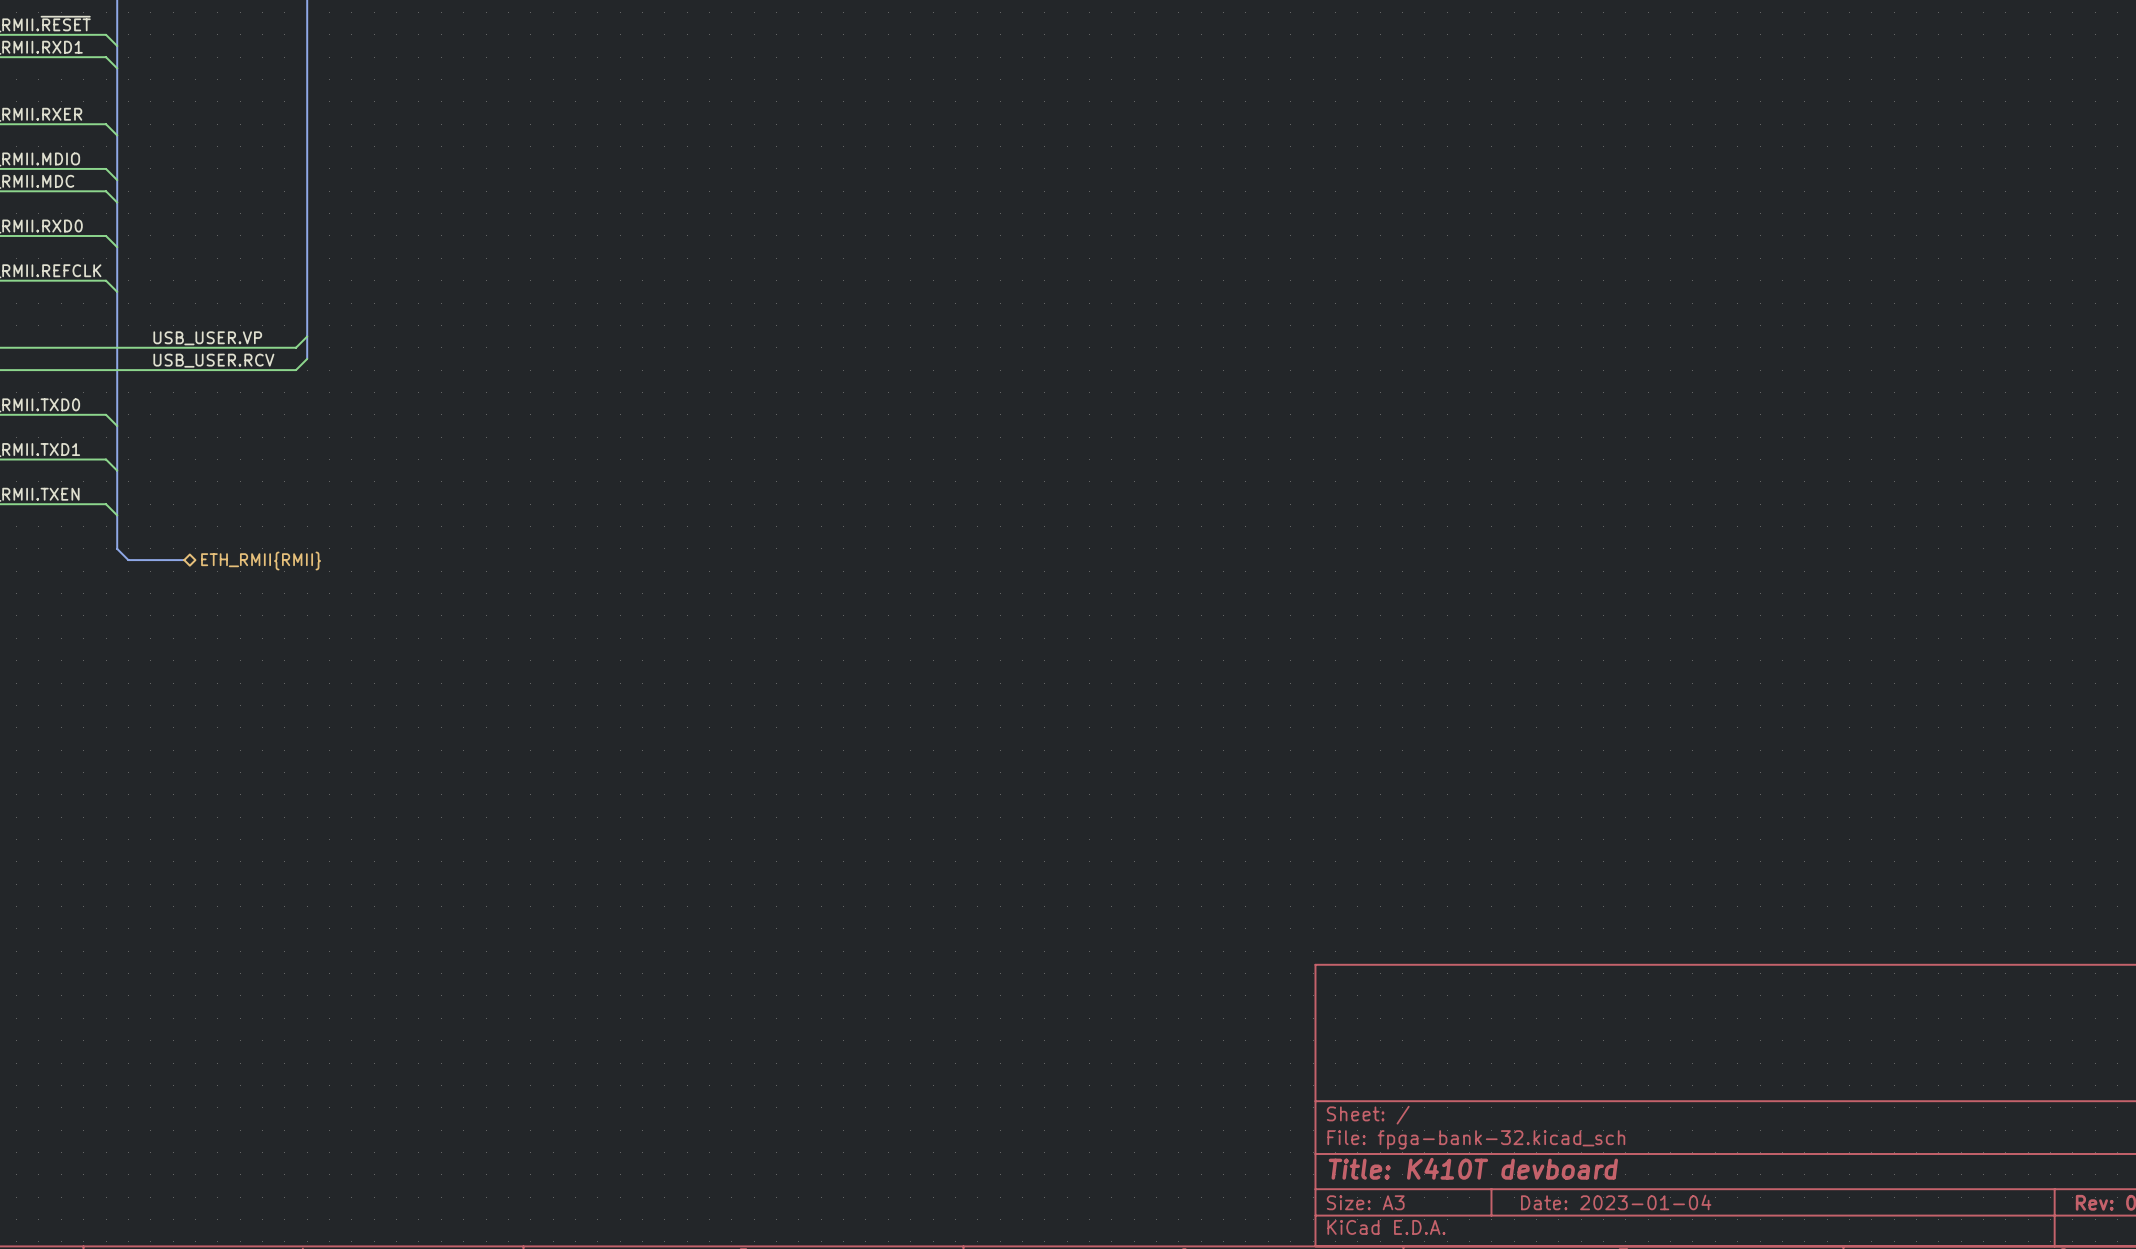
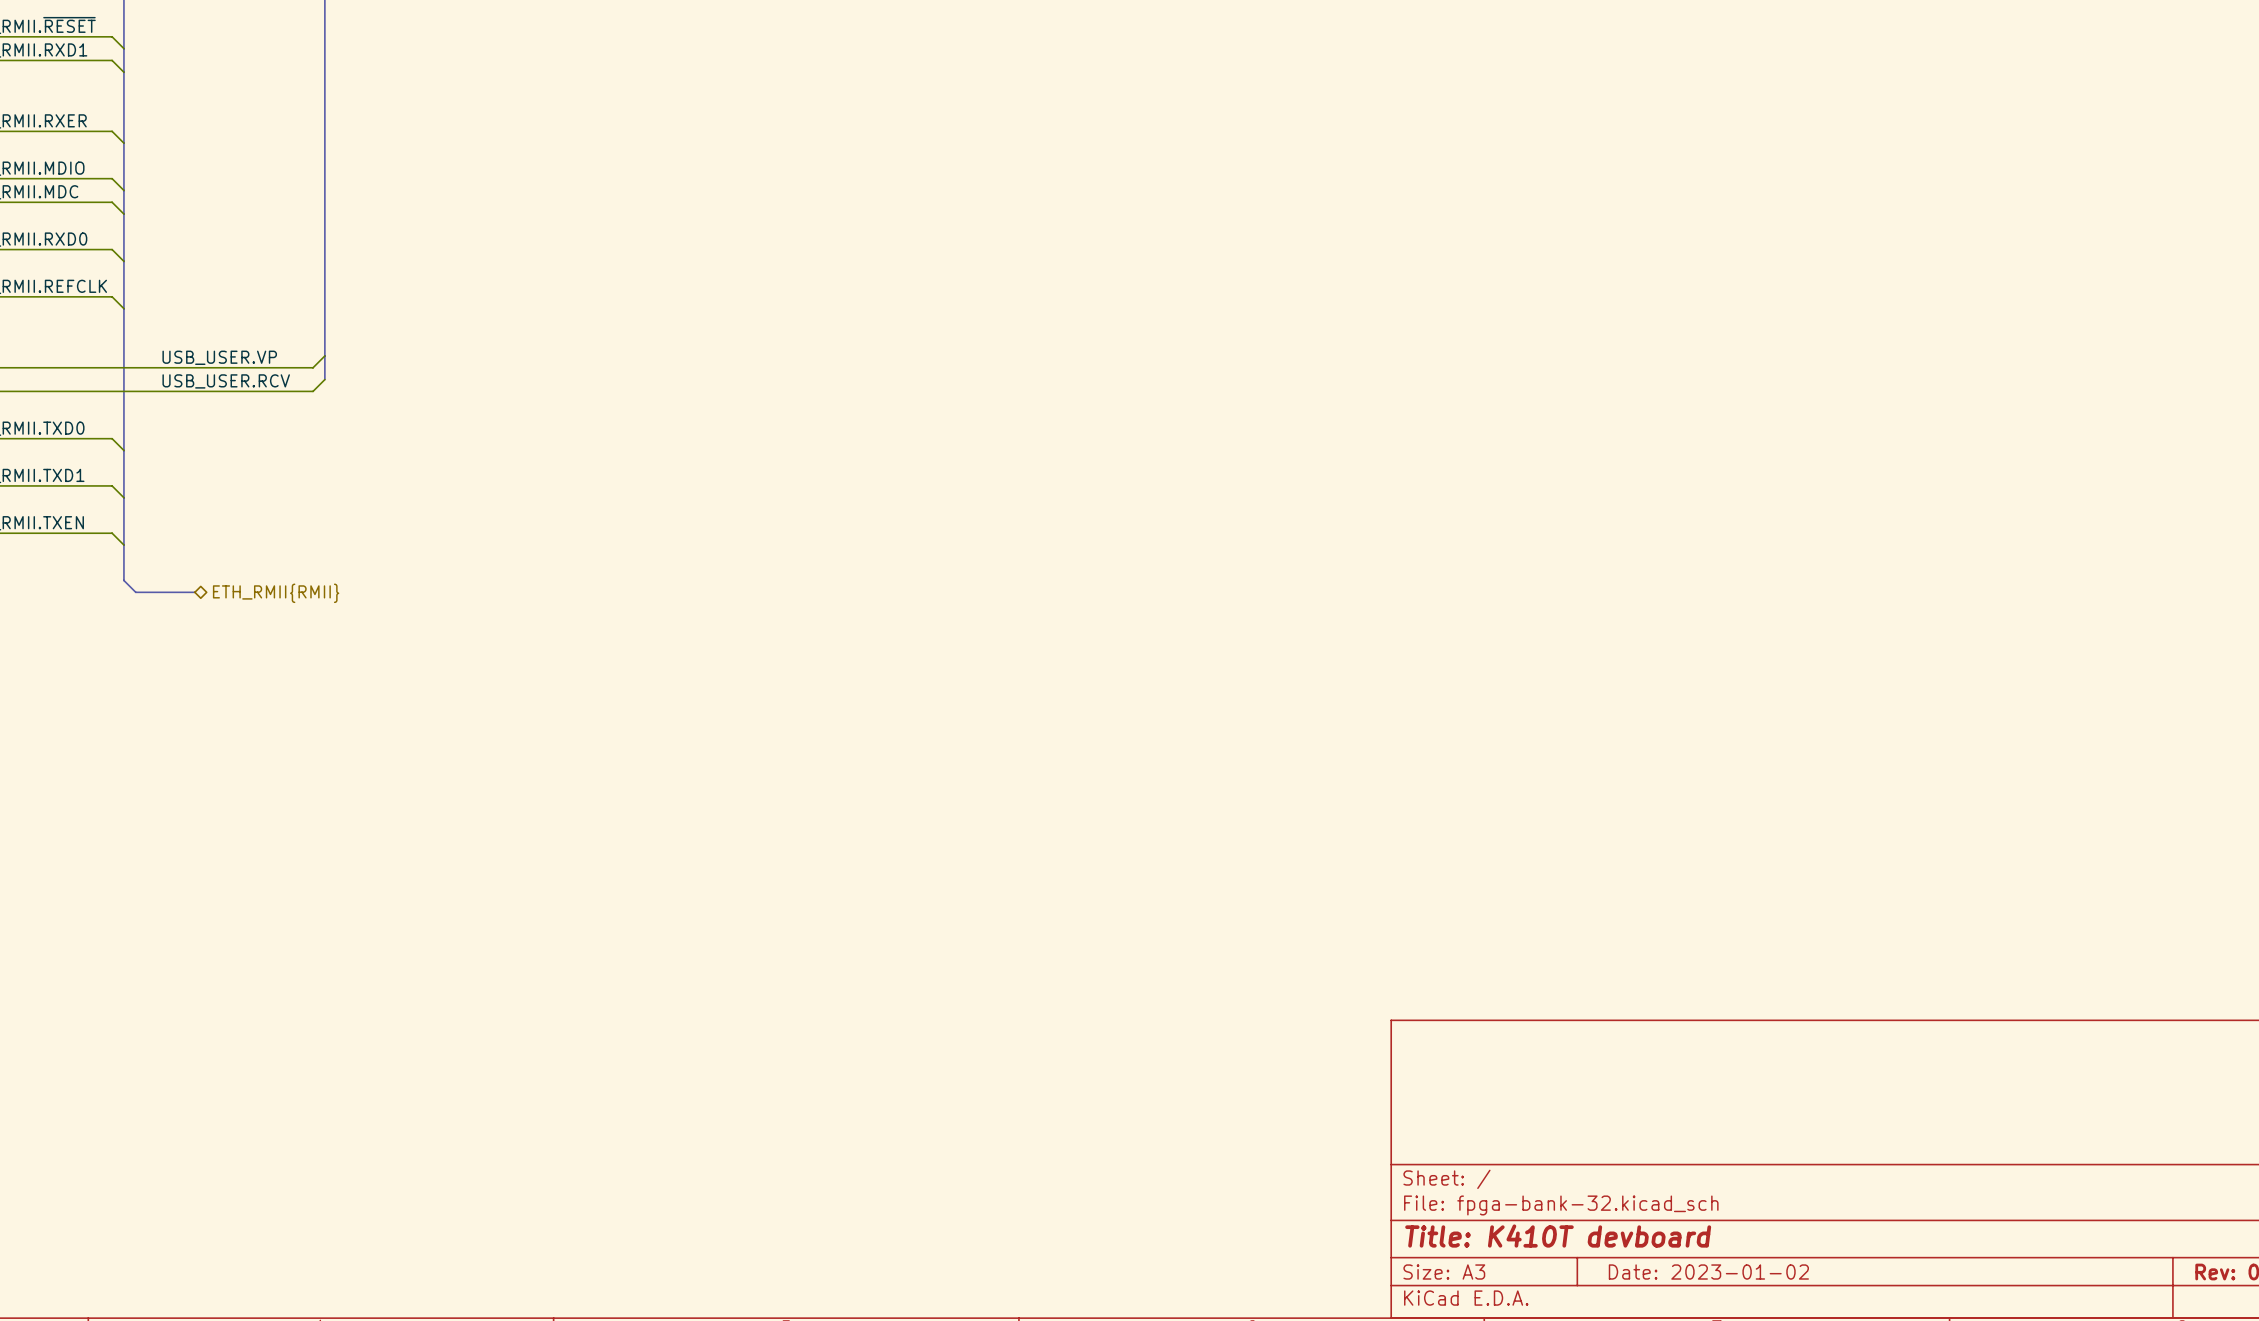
title block: Date: 2023-01-04 (1616, 1202) -> Date: 2023-01-02 (1708, 1272)

